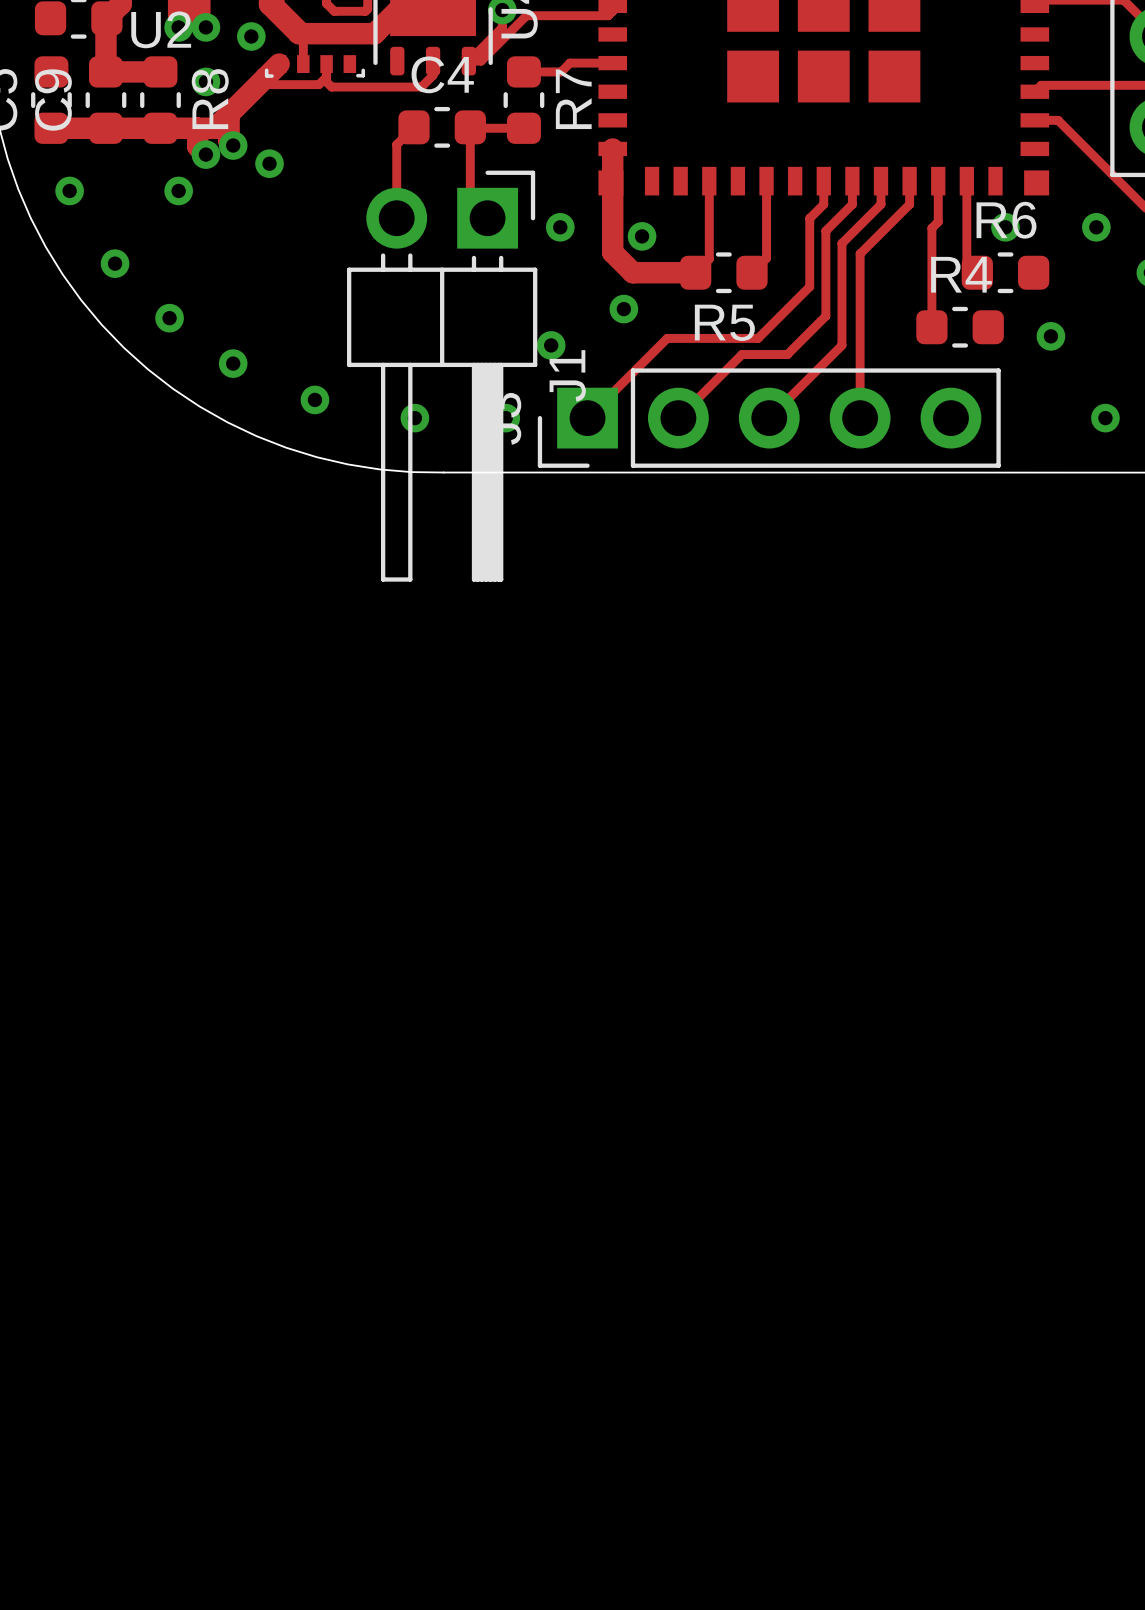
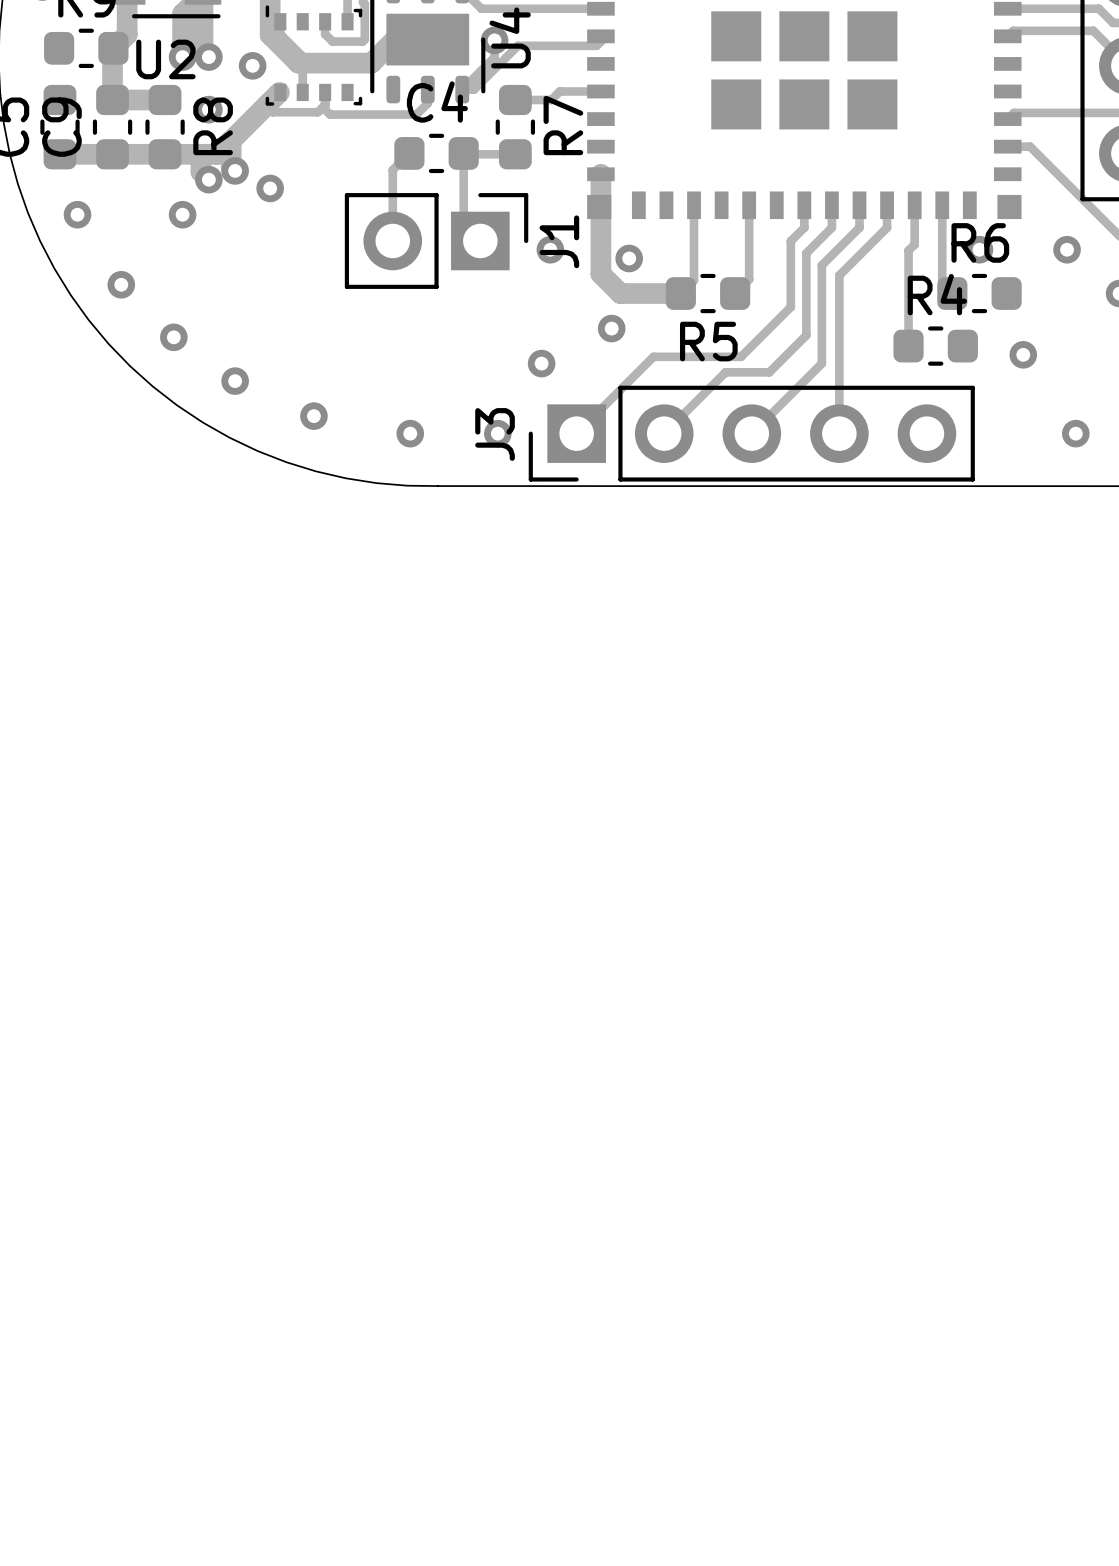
J1 footprint: [347, 170, 538, 582] -> [344, 193, 529, 289]

